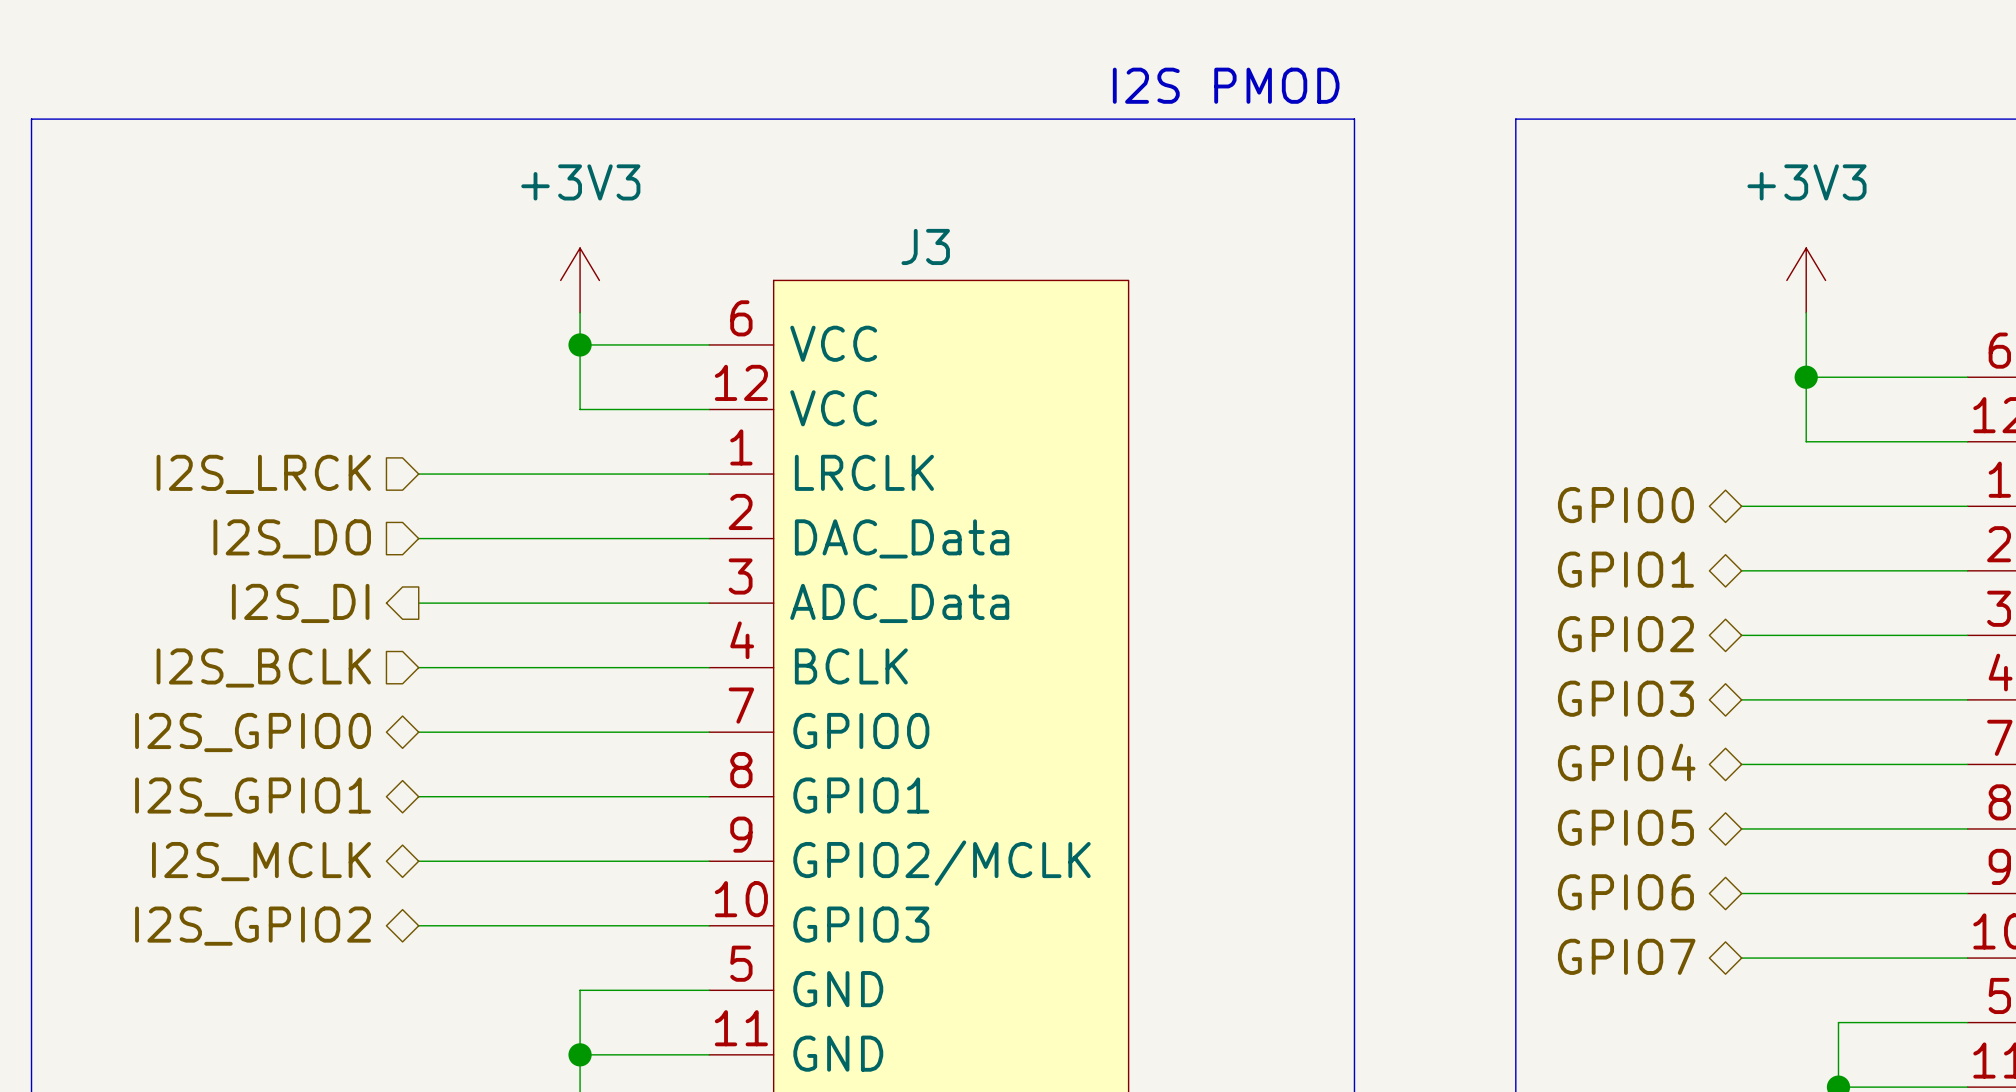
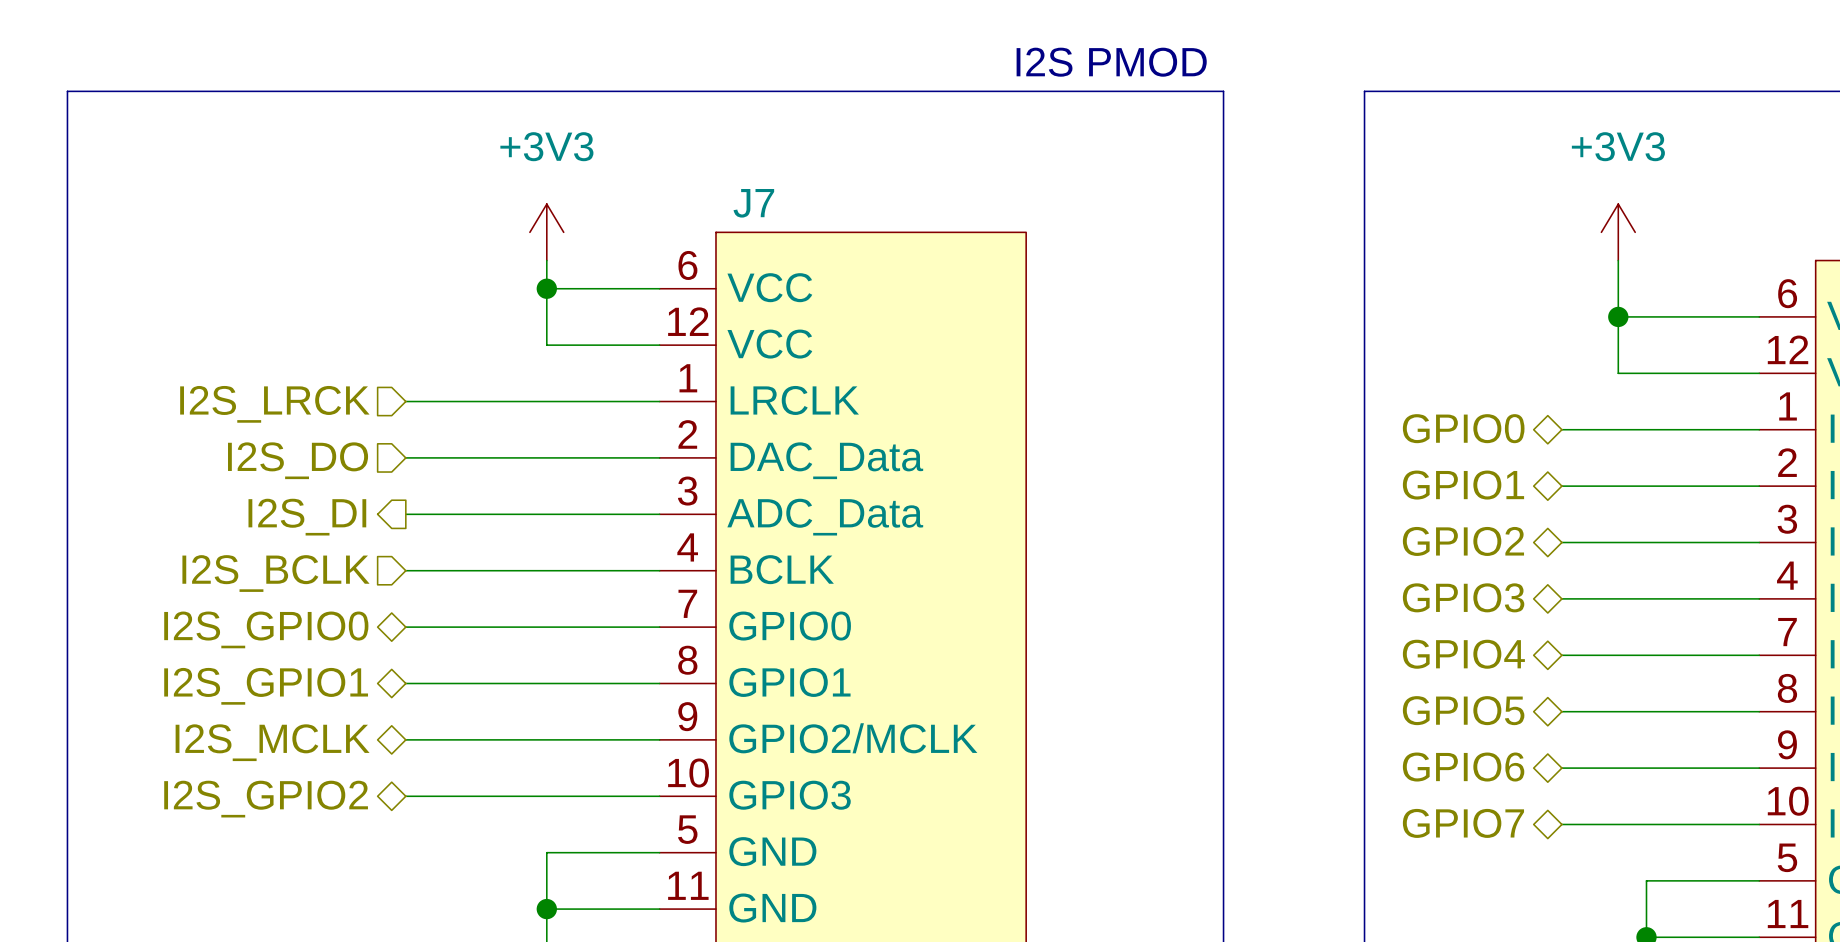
J3 name: J3 (925, 246) -> J7 (753, 203)

